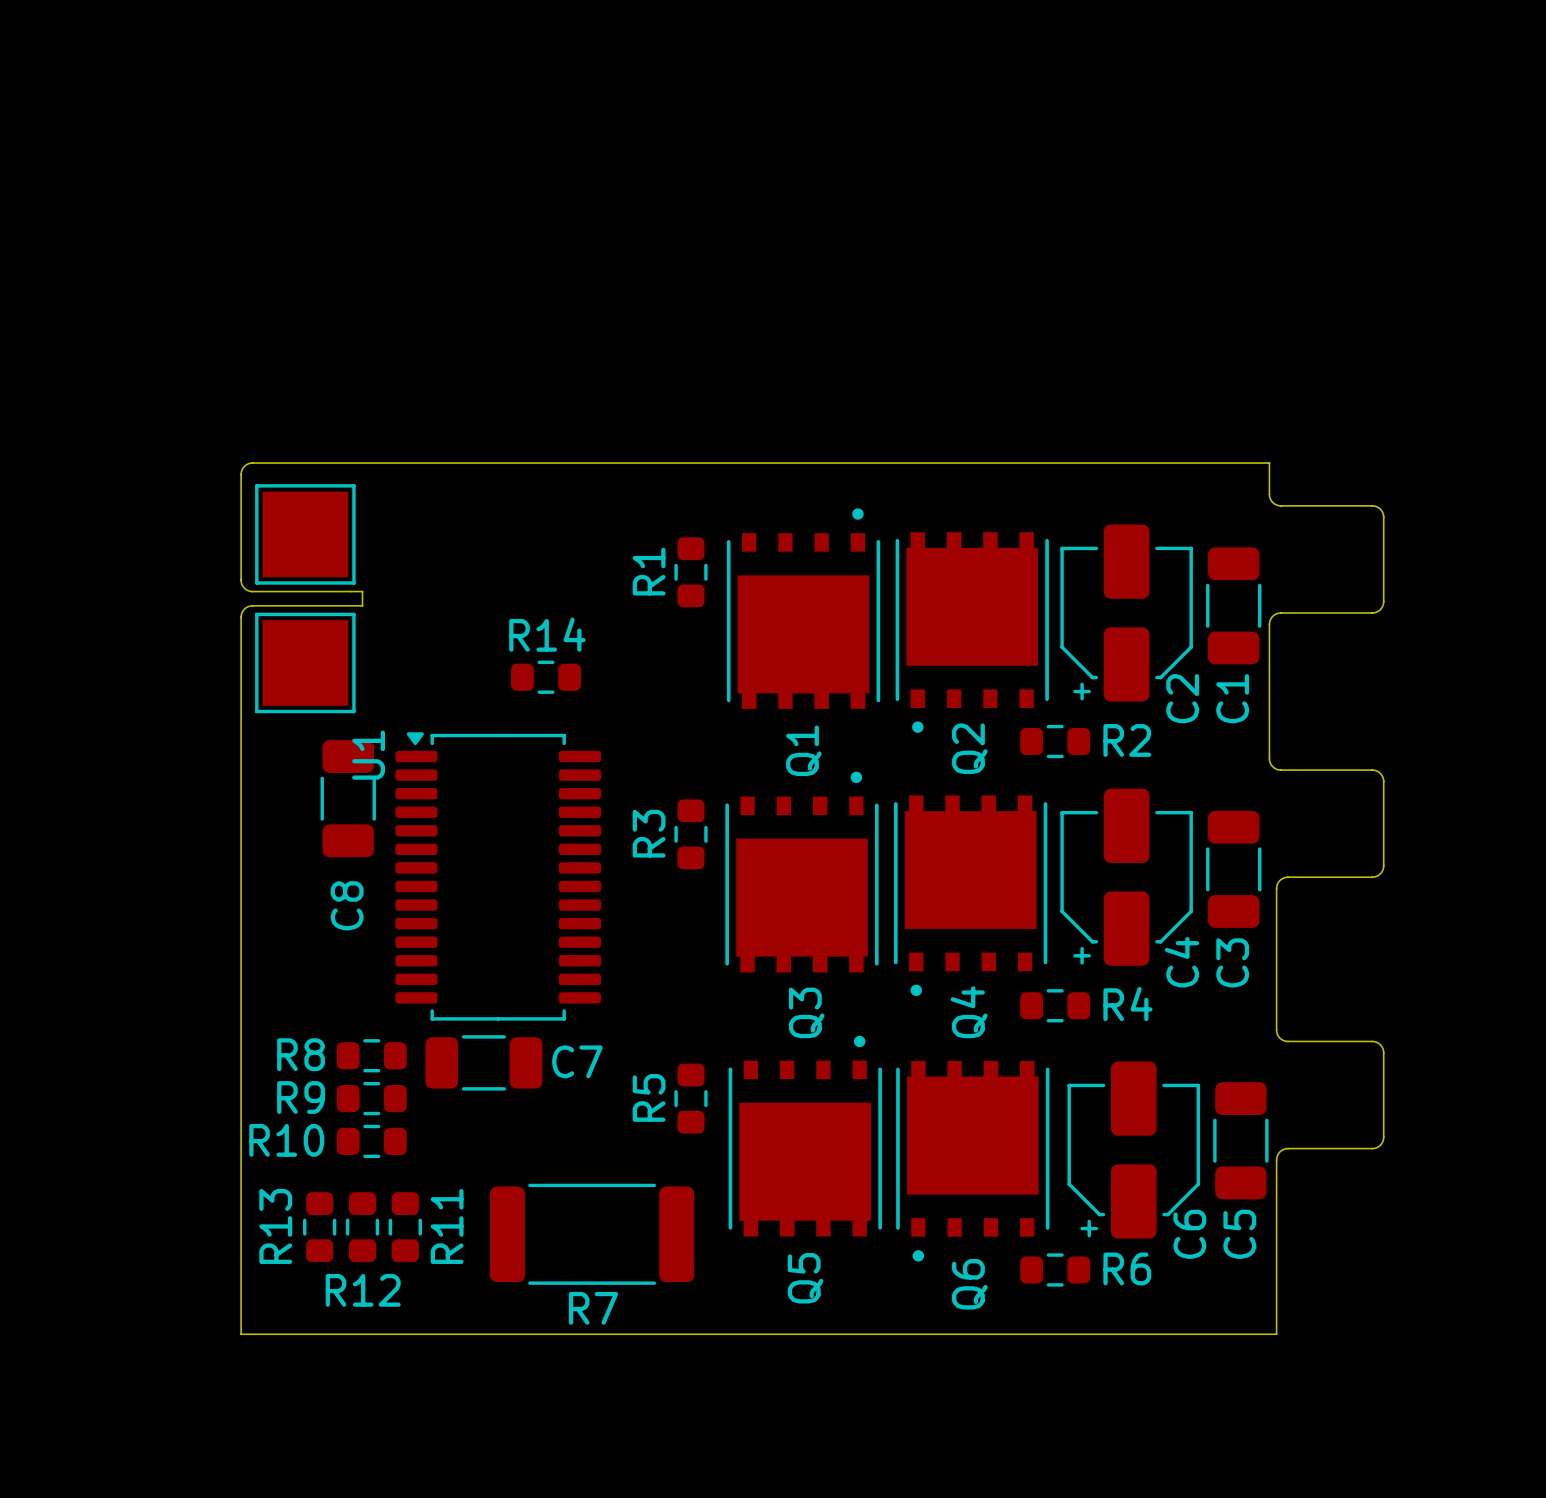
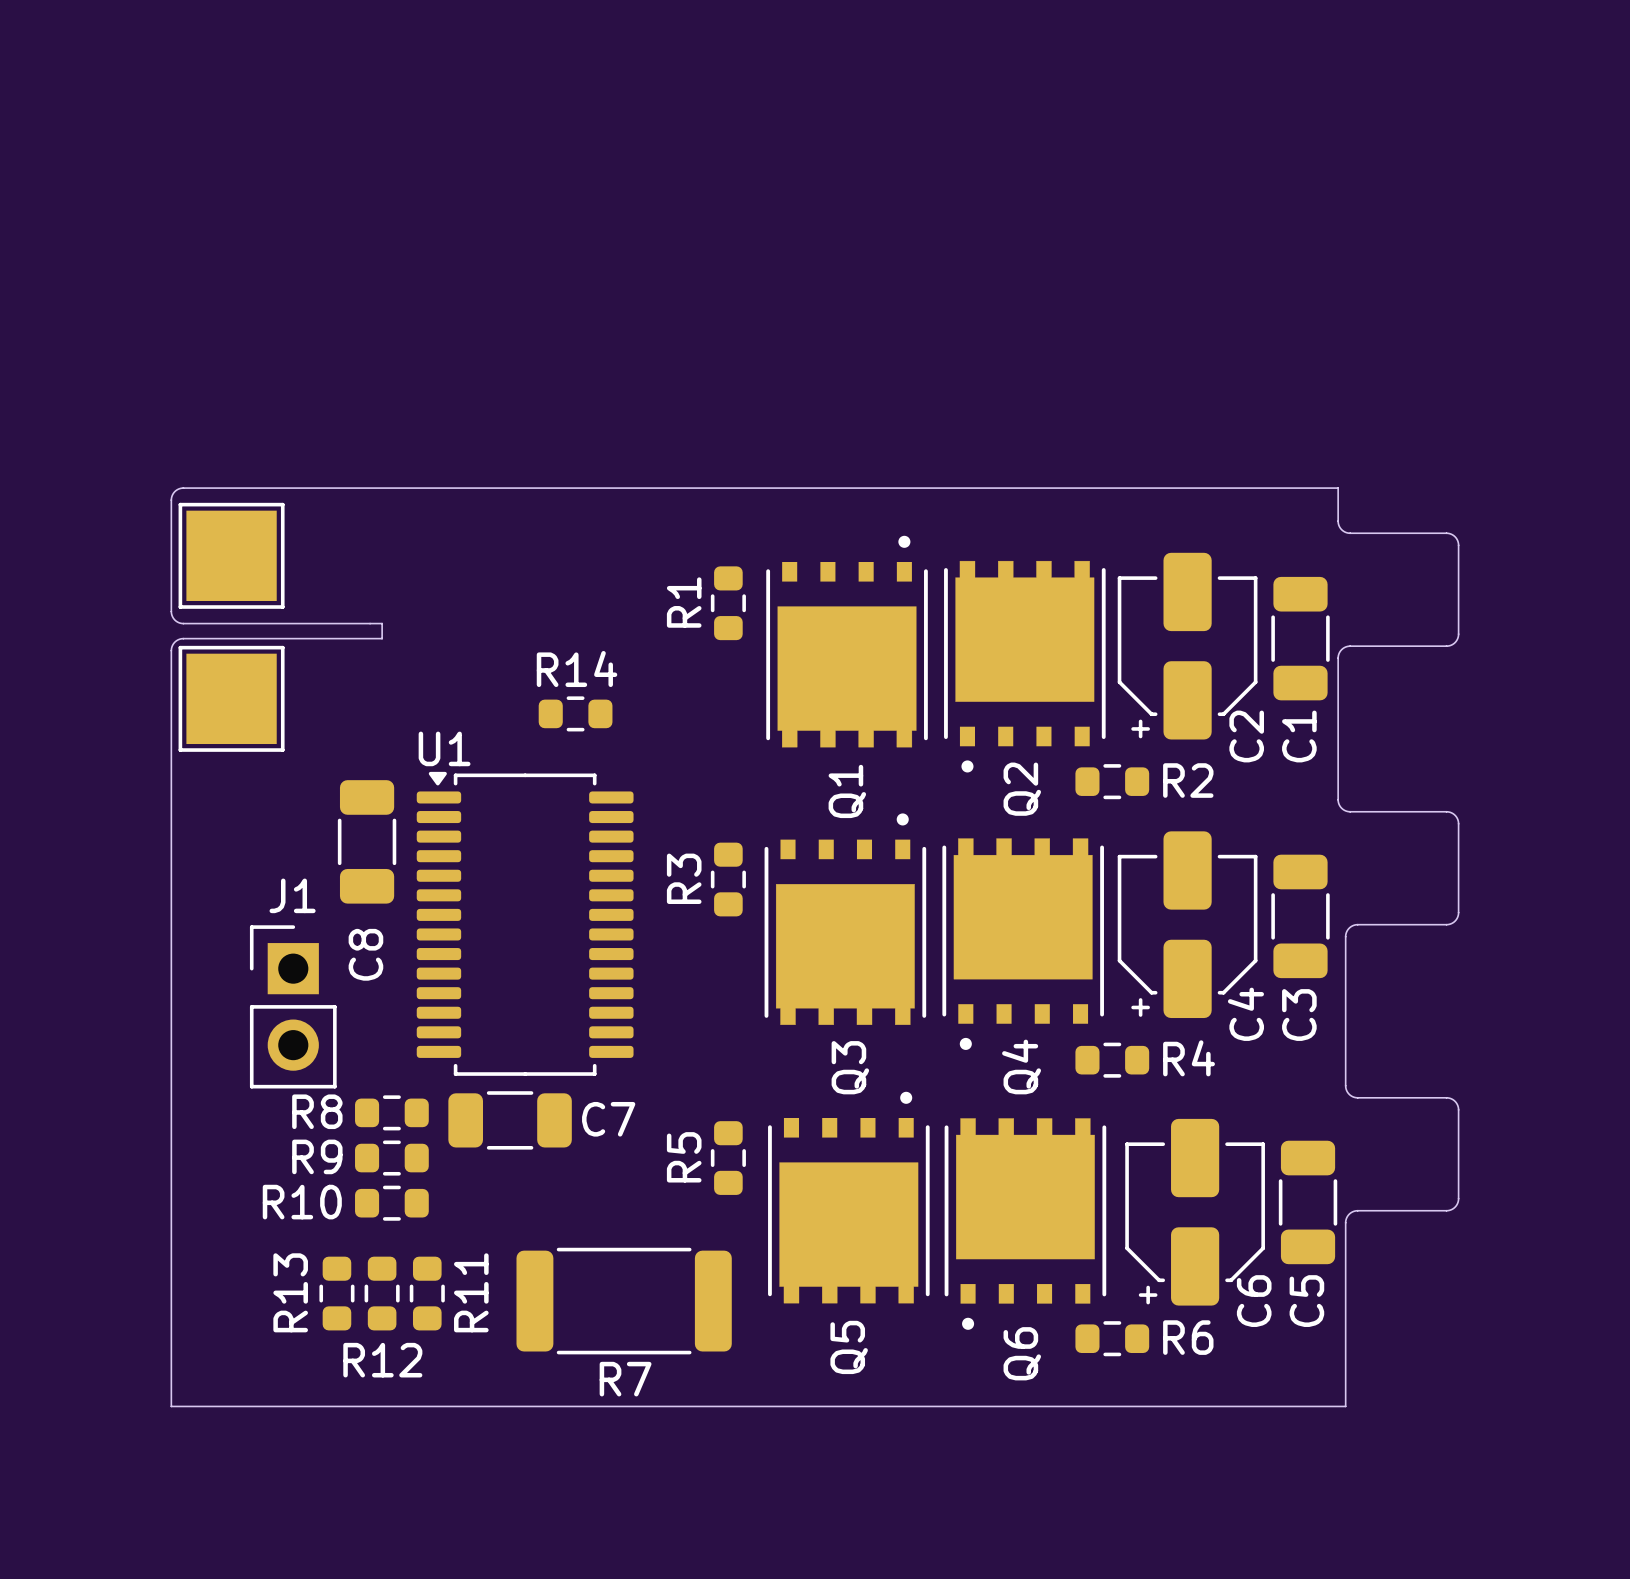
board edge: (252, 463) (244, 466) (241, 474) (241, 581) (244, 588) (252, 591) -> (266, 488) (182, 488) (173, 492) (171, 500) (171, 611) (173, 619) (183, 623) (266, 623)
part: none -> (231, 555)
part: (305, 534) -> none
board edge: (252, 605) (244, 609) (241, 617) (241, 1334) -> (266, 638) (182, 638) (173, 643) (171, 650) (171, 1406) (254, 1406)
part: none -> (231, 698)
part: (305, 662) -> none
U1 name rotation: 0° (368, 755) -> 90° clockwise (444, 748)
J1: none -> (293, 1006)

